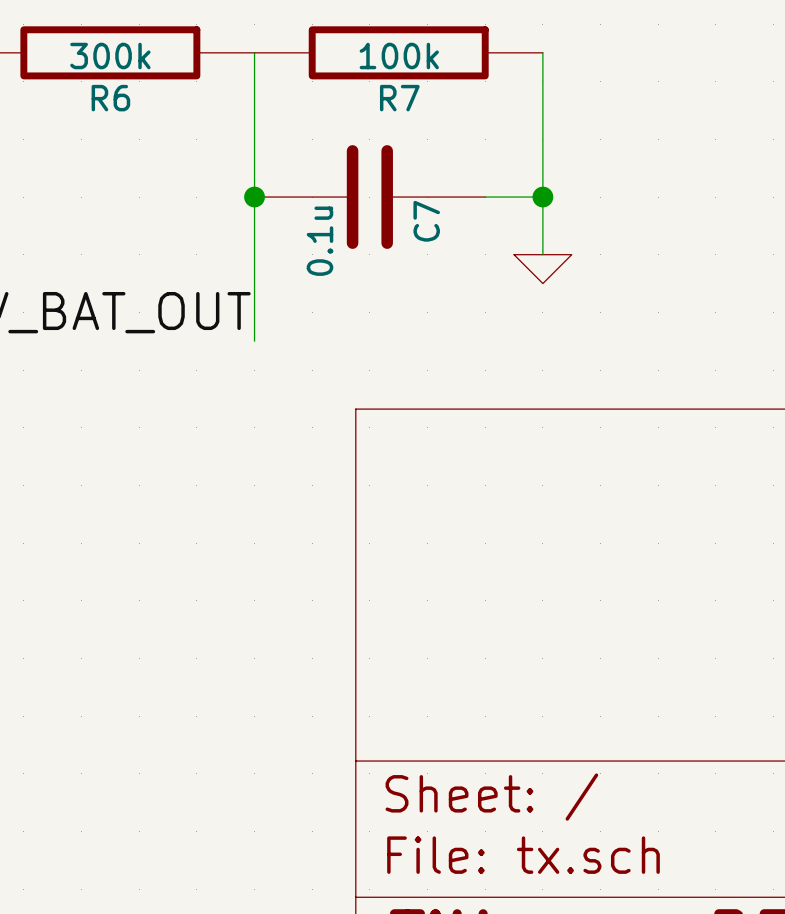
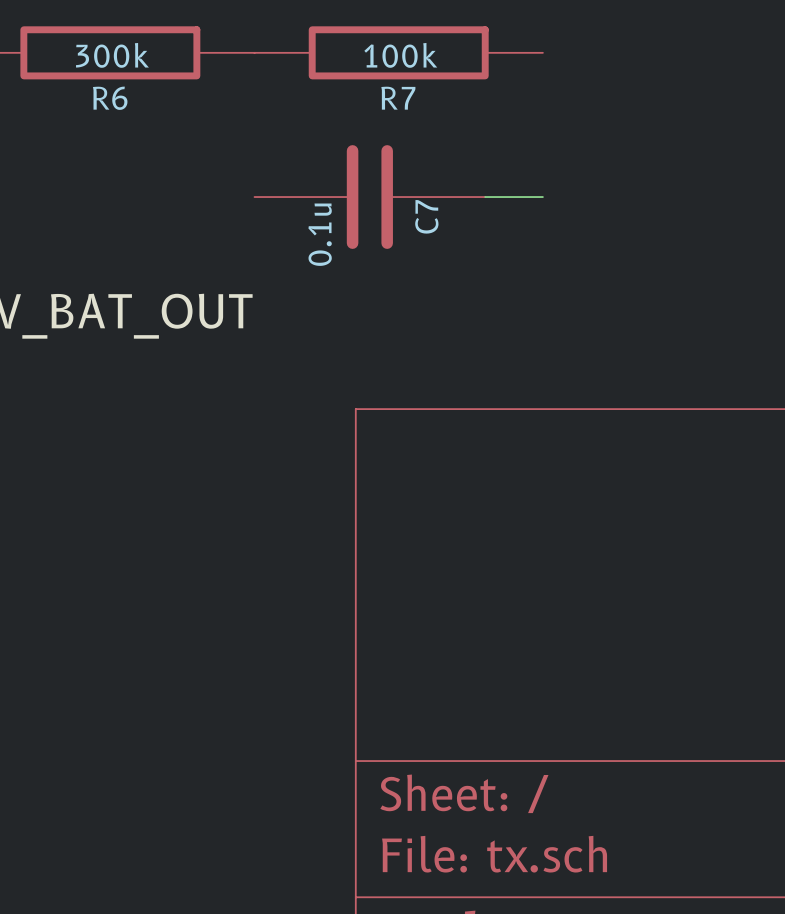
wire: (254, 52) (254, 341) -> none
wire: (542, 52) (542, 254) -> none
junction: (254, 197) -> none
junction: (542, 197) -> none
power symbol: (542, 269) -> none

